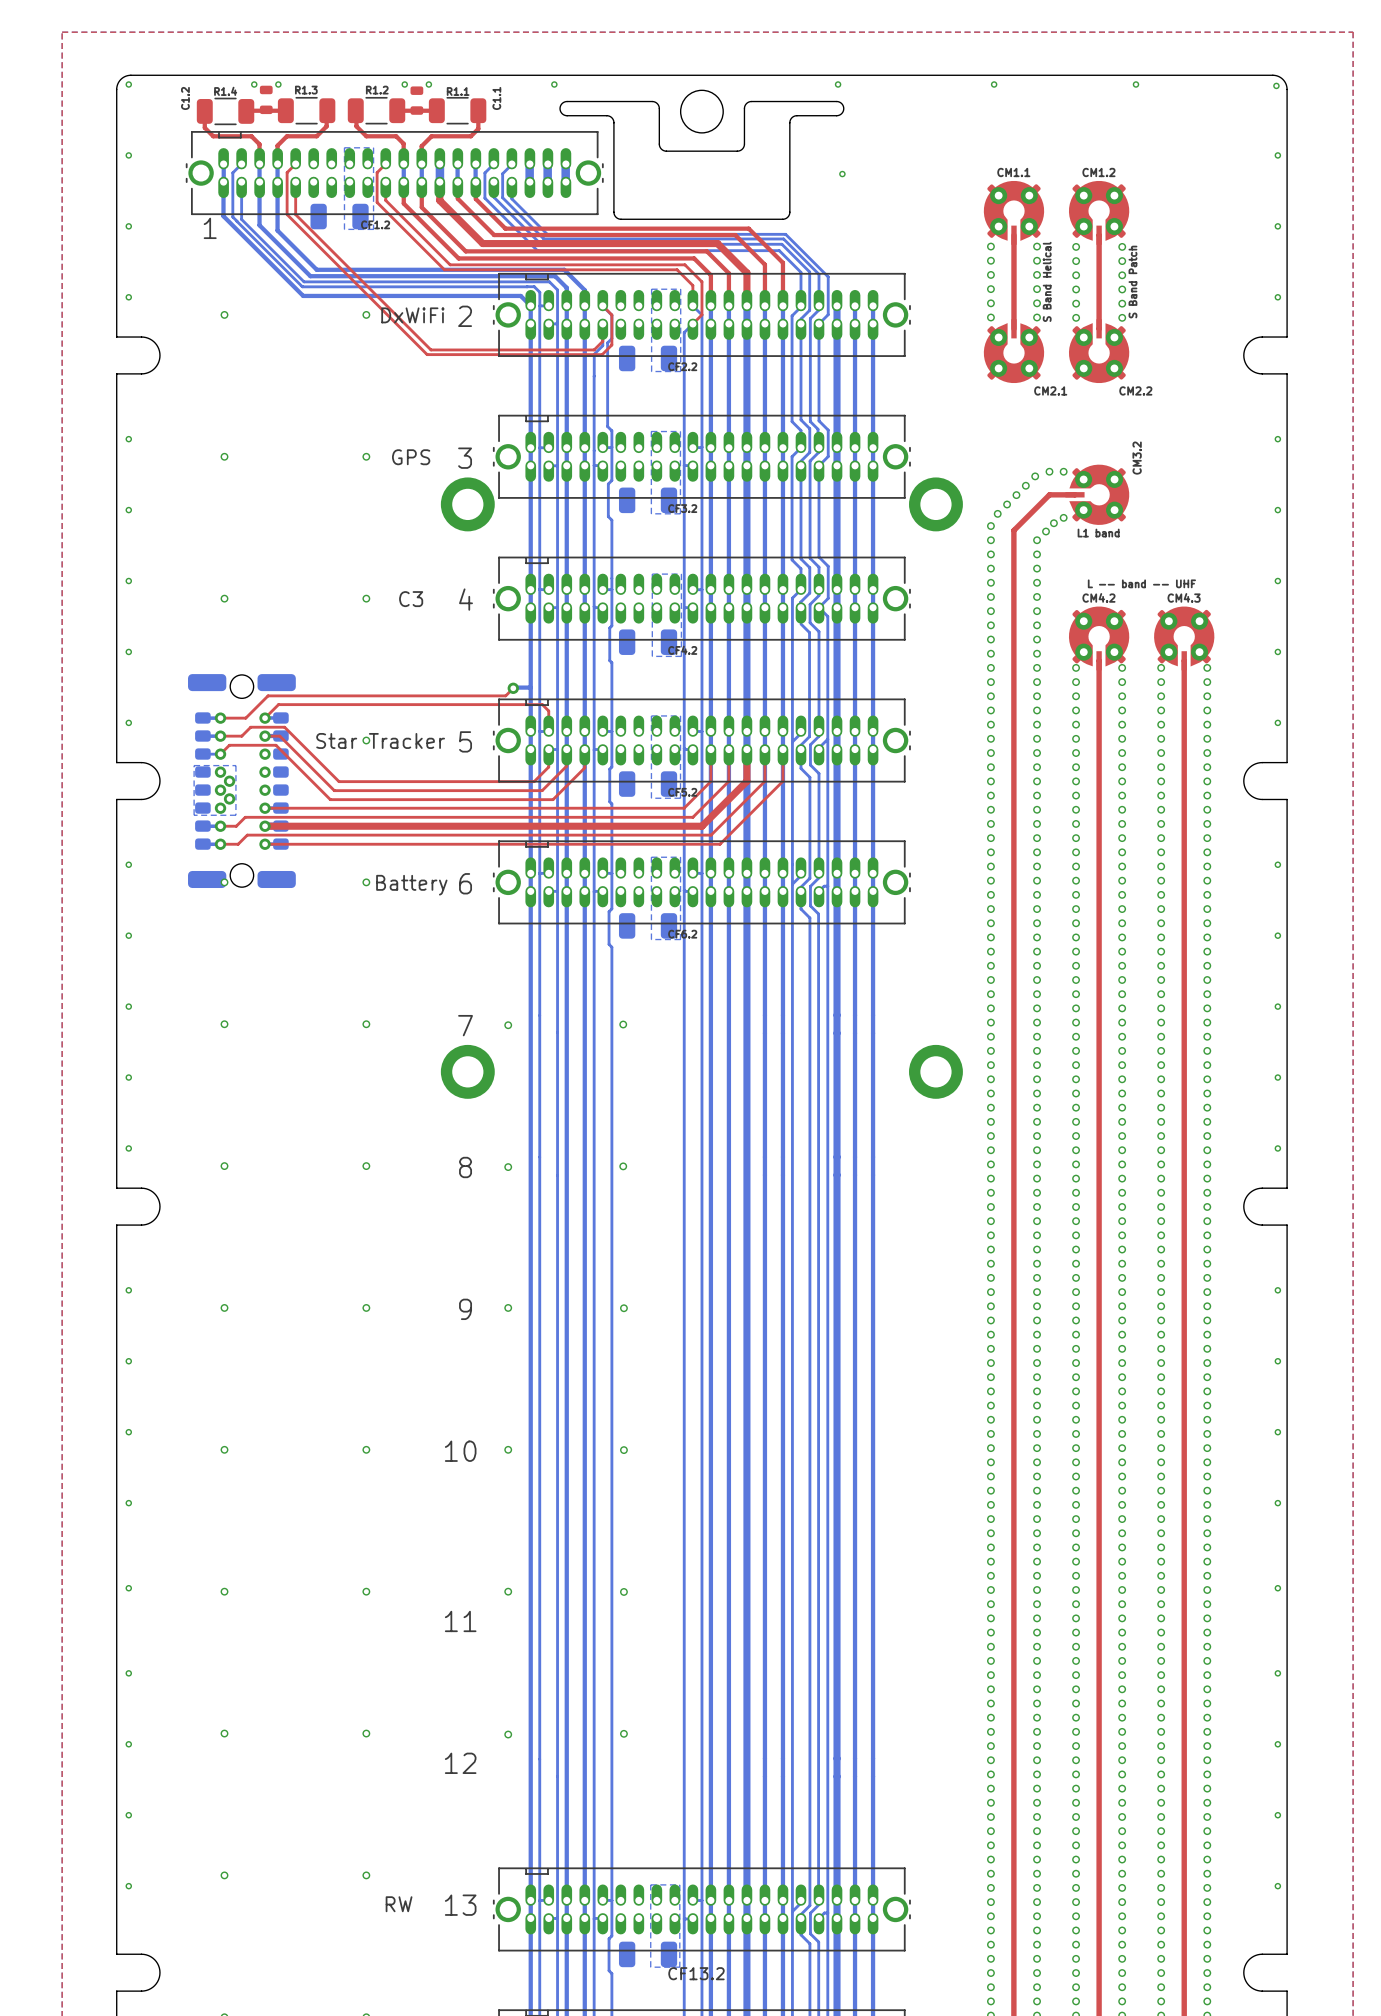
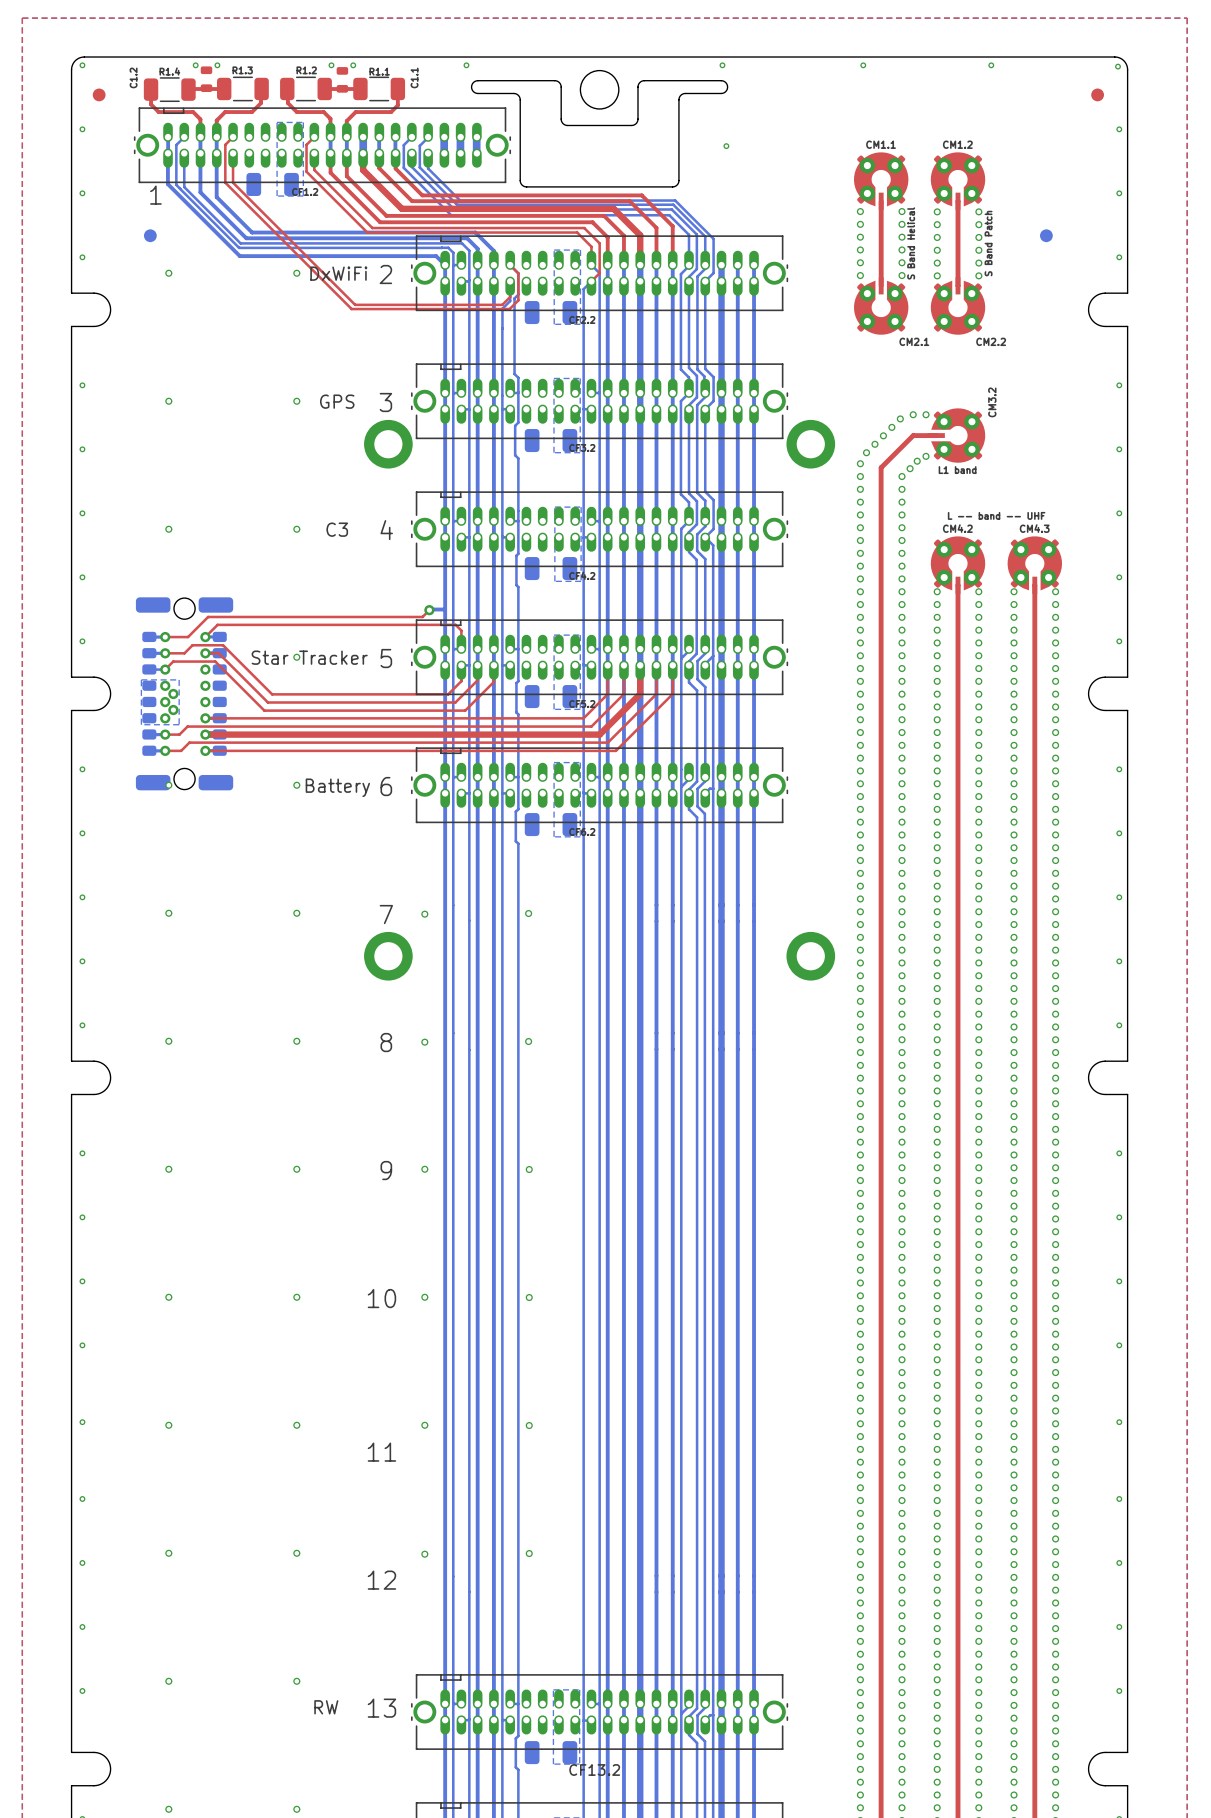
part: none -> (99, 94)
part: none -> (1097, 94)
part: none -> (150, 235)
part: none -> (1046, 235)

